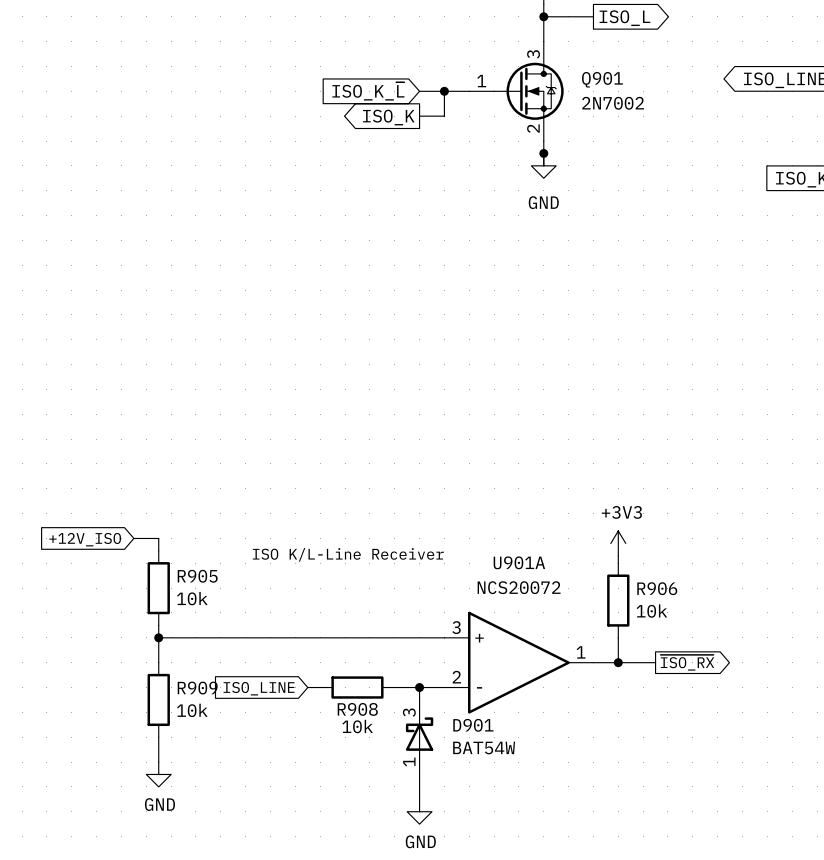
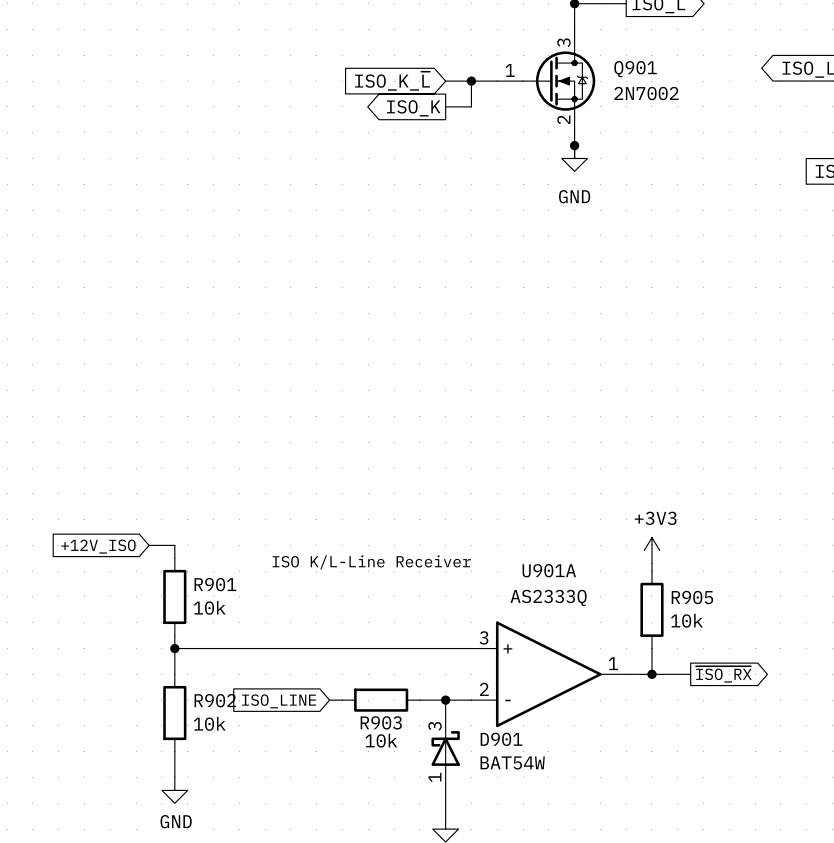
R905 name: R905 (197, 576) -> R901 (215, 584)
U901A value: NCS20072 (519, 587) -> AS2333Q (548, 597)
R906 name: R906 (657, 588) -> R905 (692, 597)
R909 name: R909 (197, 688) -> R902 (215, 700)
R908 name: R908 (357, 709) -> R903 (381, 722)

